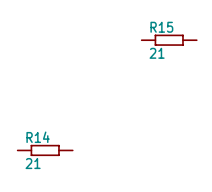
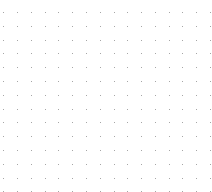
R15: 21 (169, 40) -> none
R14: 21 (45, 150) -> none

